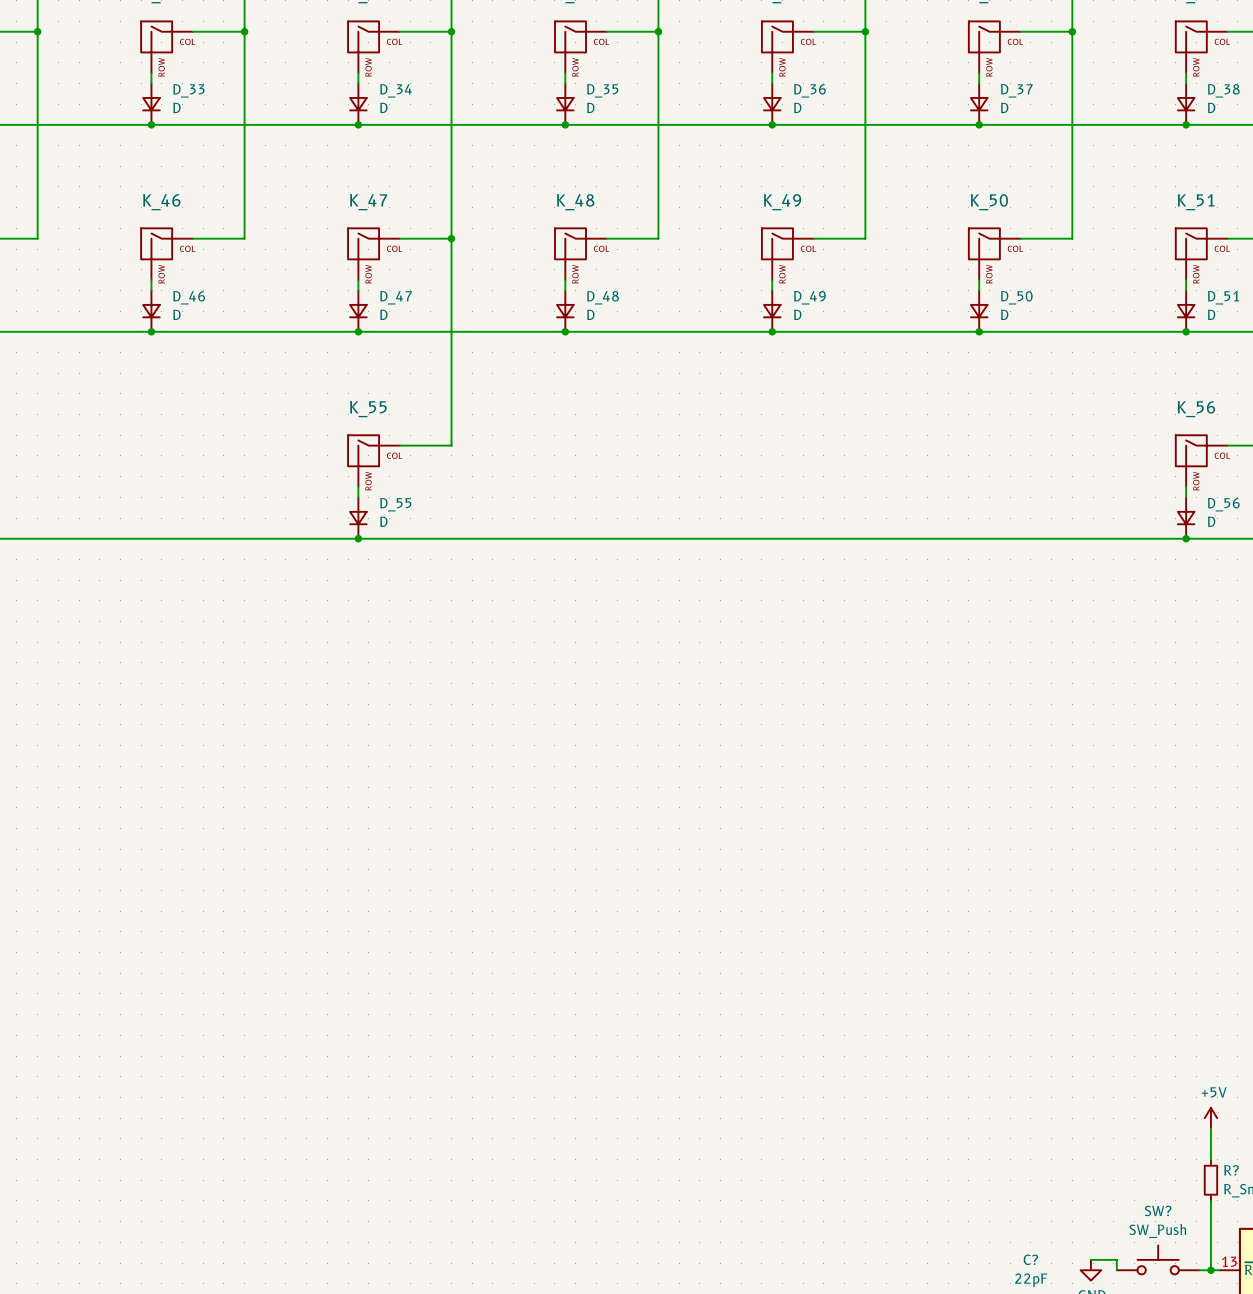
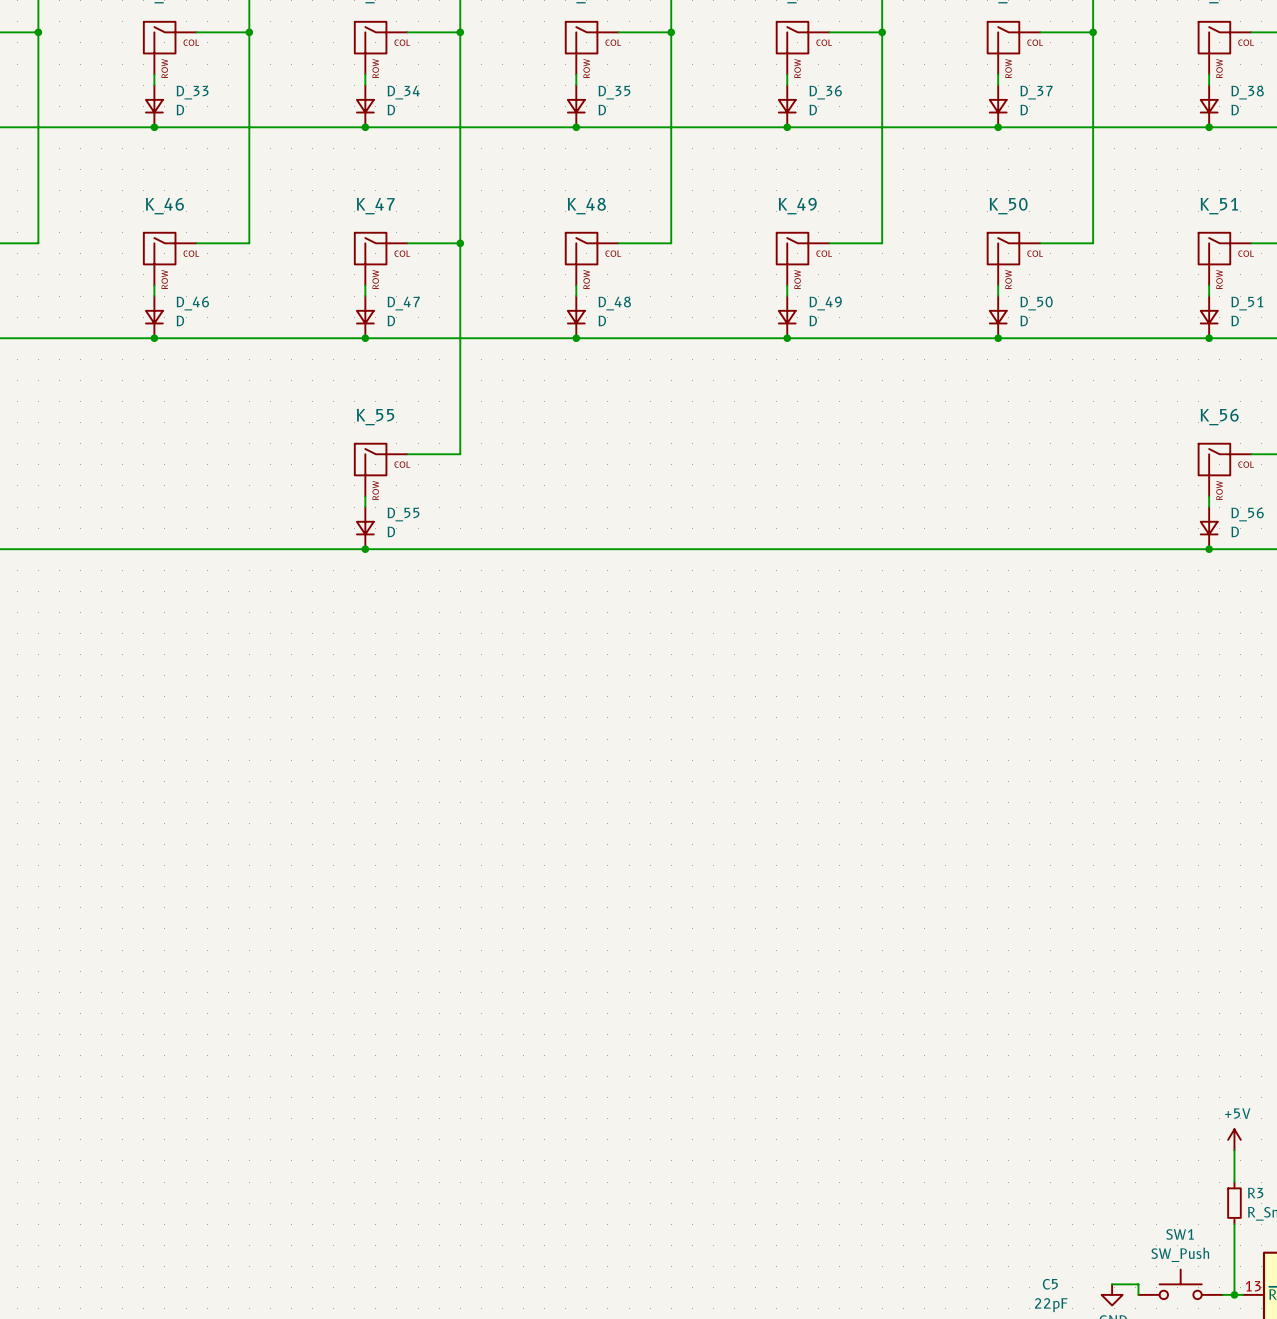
R? name: R? (1231, 1170) -> R3 (1255, 1193)
SW? name: SW? (1158, 1210) -> SW1 (1180, 1234)
C? name: C? (1030, 1259) -> C5 (1050, 1284)

